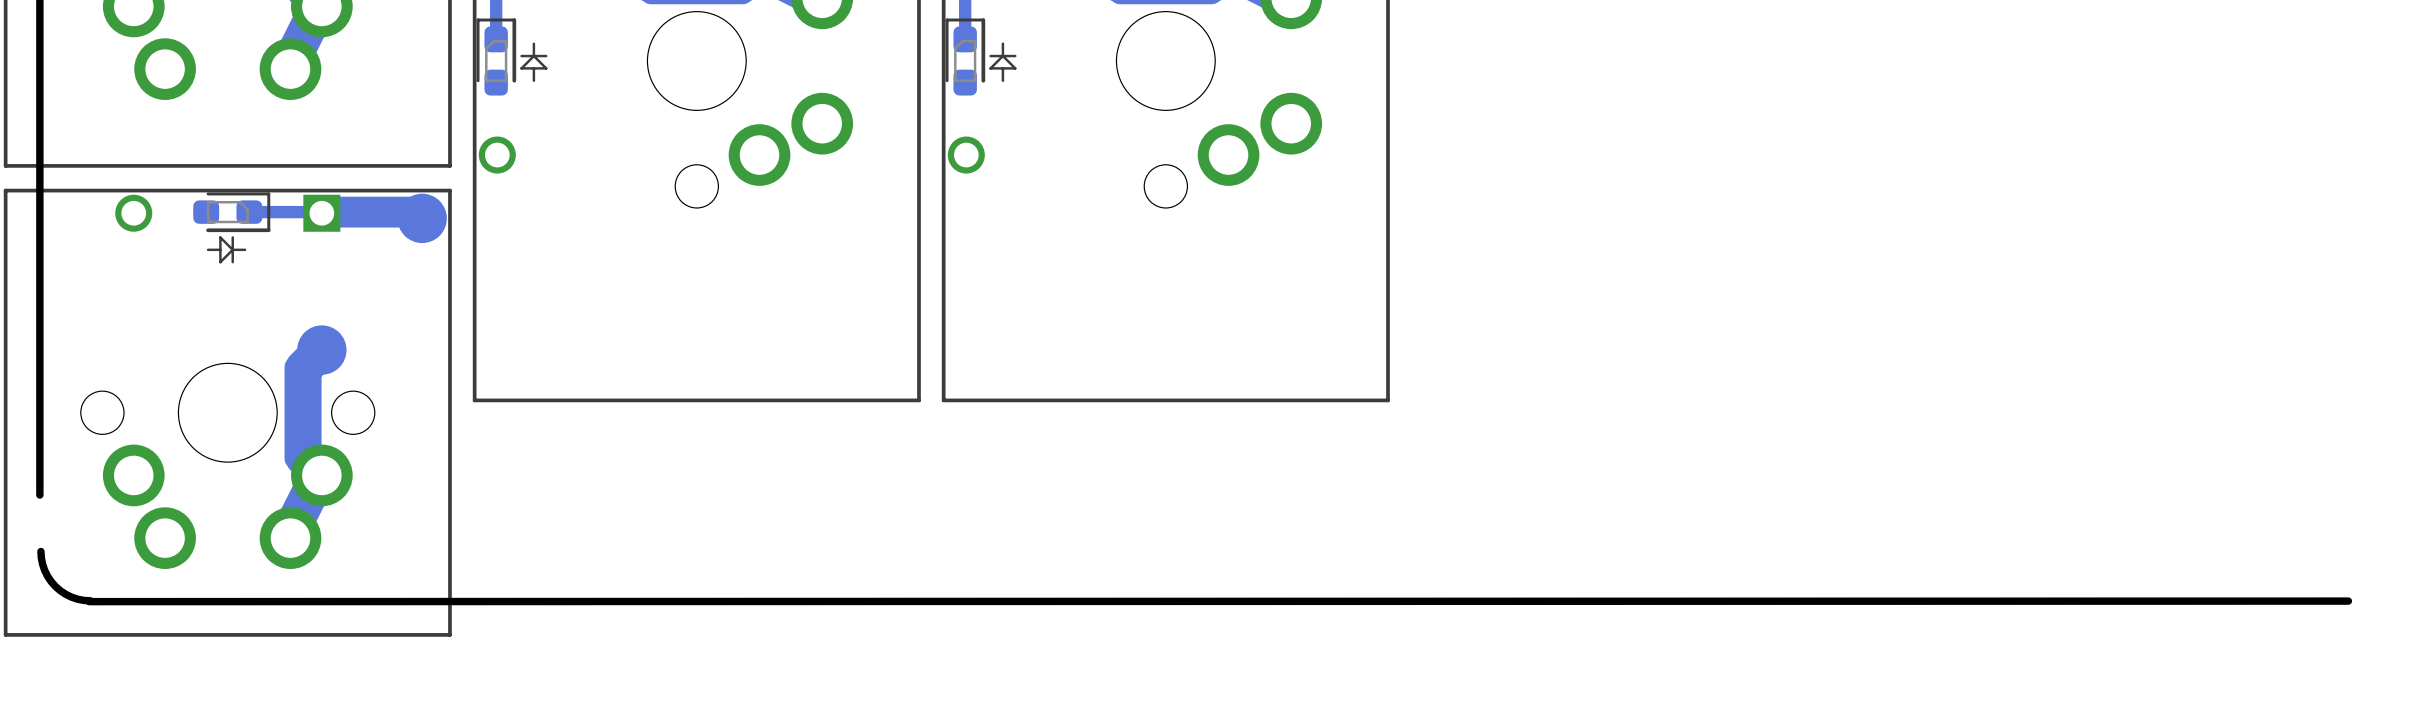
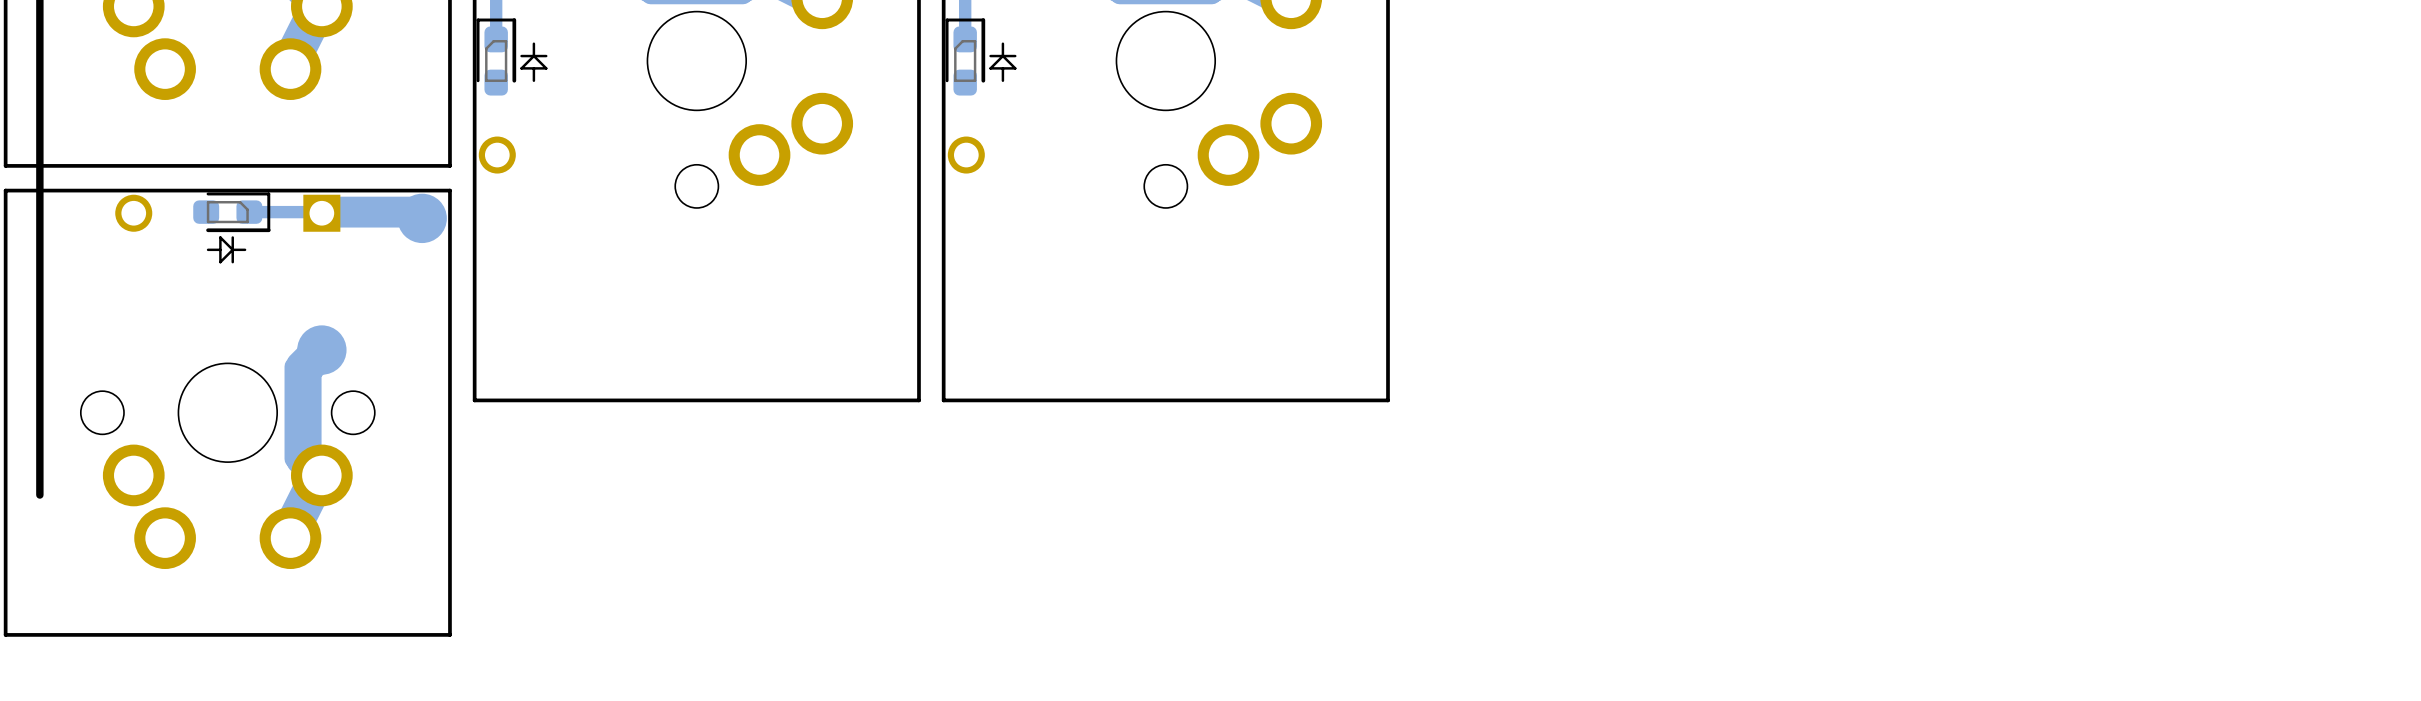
board edge: (40, 551) (44, 570) (55, 586) (71, 597) (90, 600) -> none
board edge: (2348, 601) (89, 601) -> none

